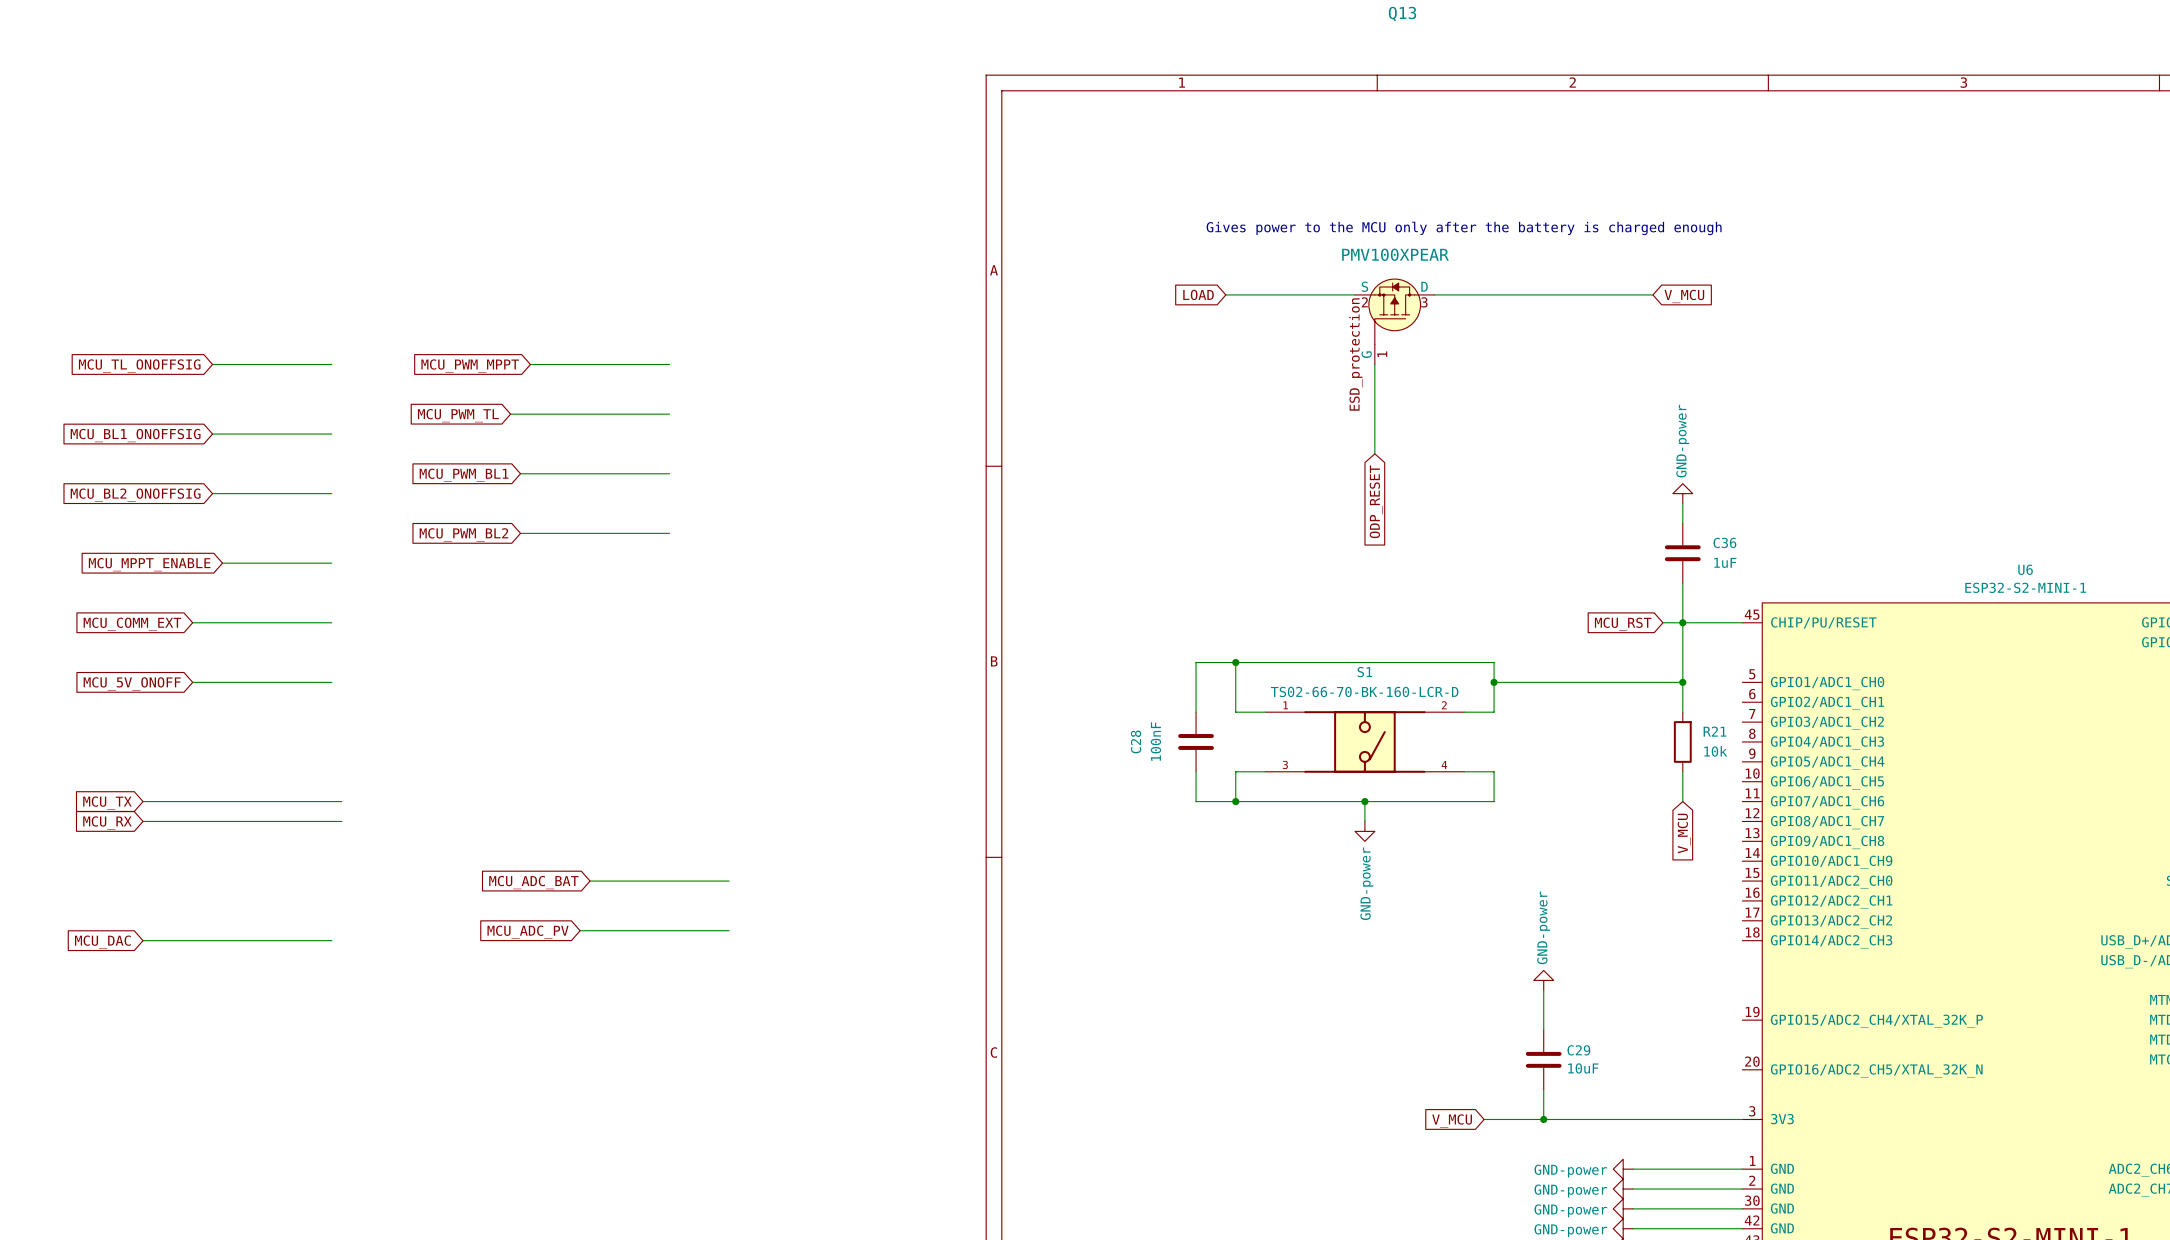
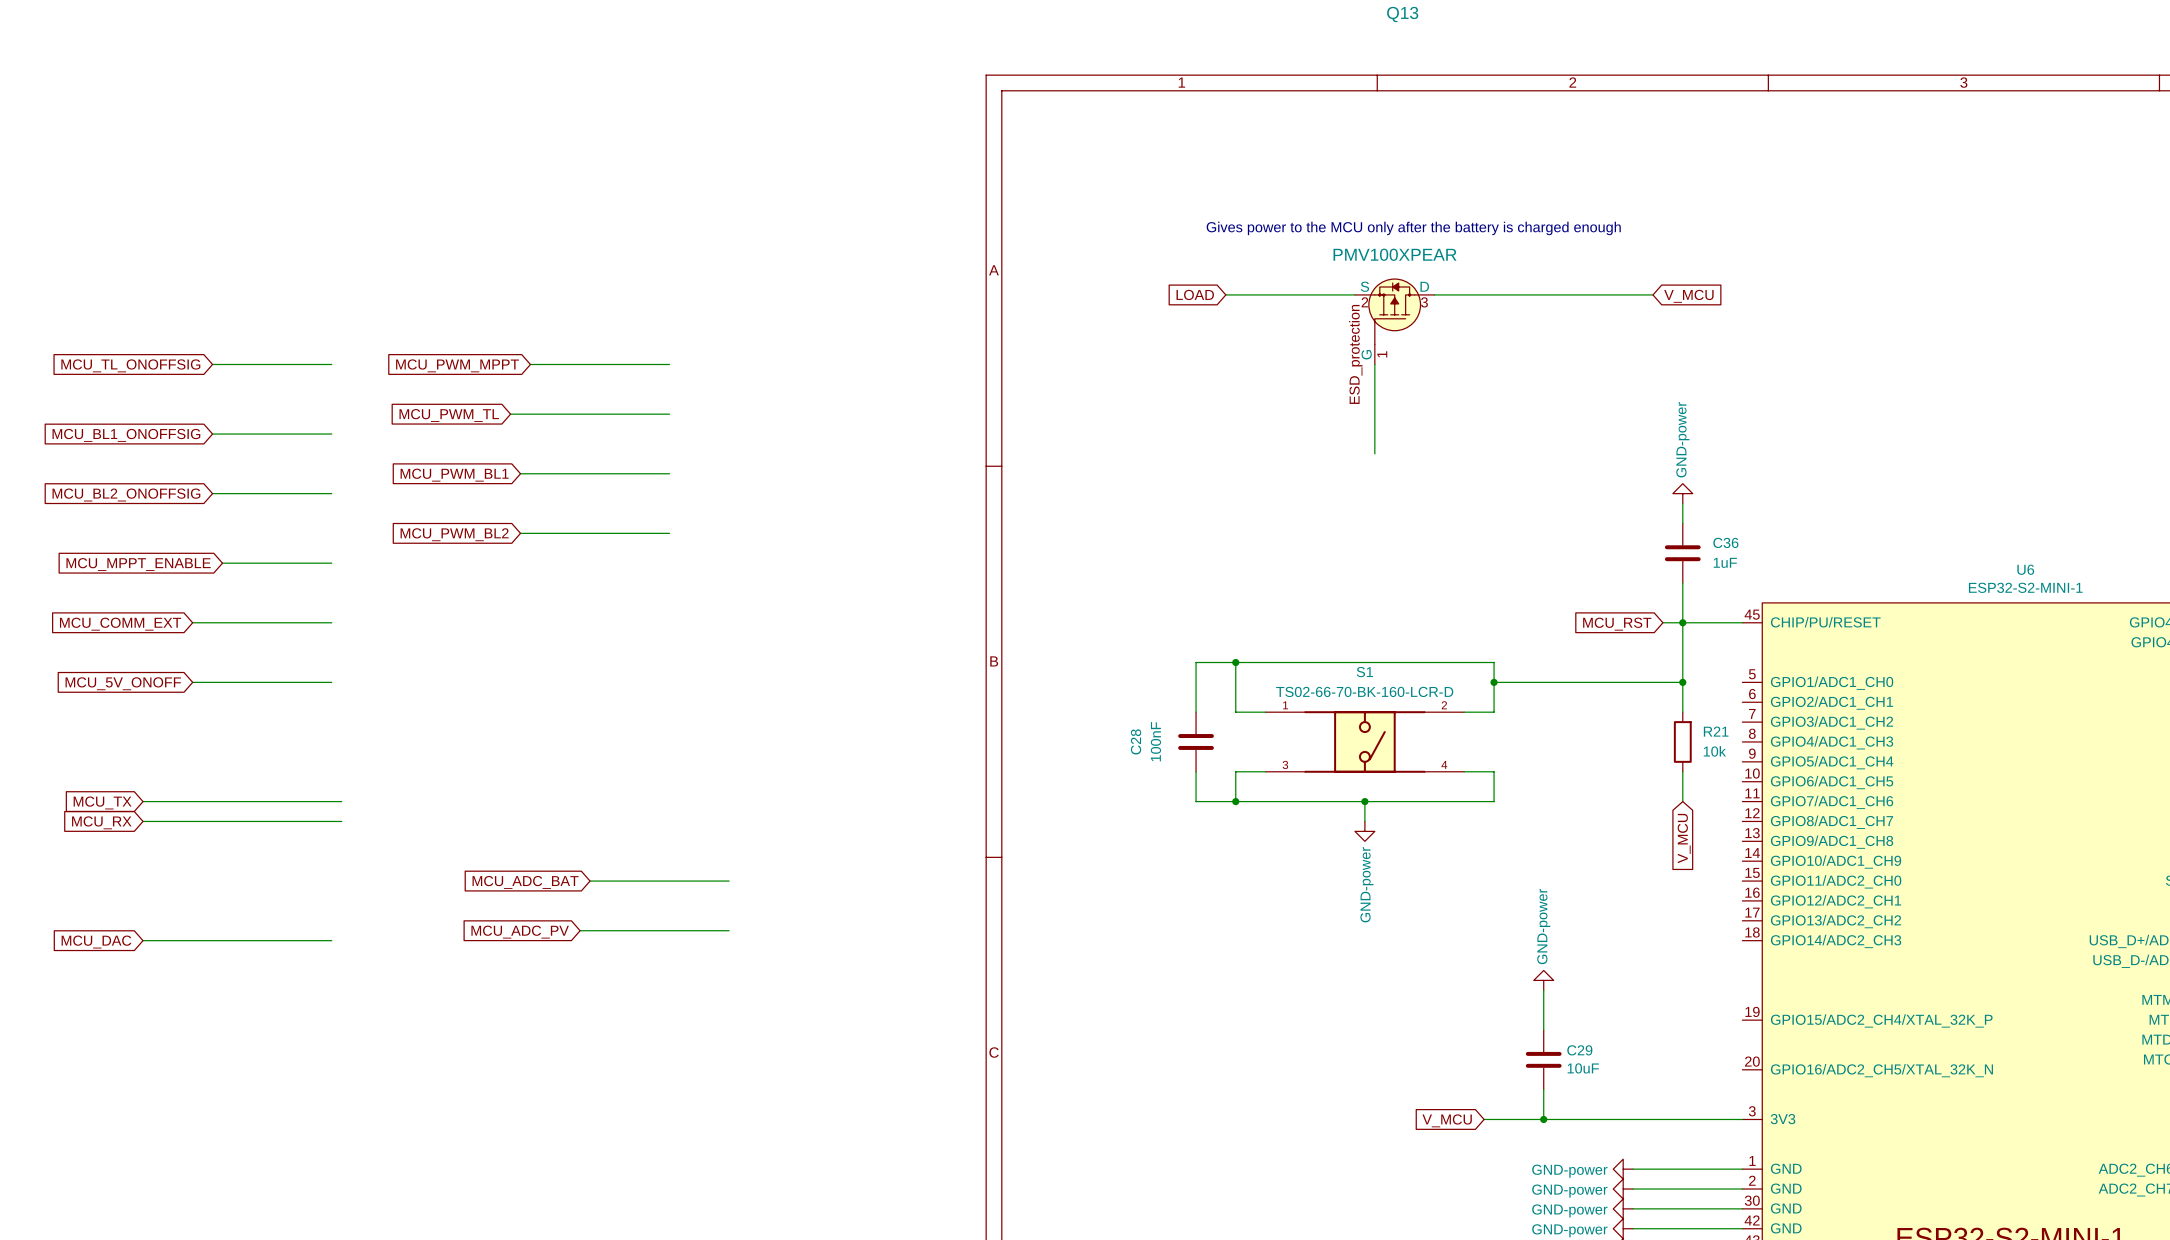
global label: ODP_RESET (1376, 501) -> none

